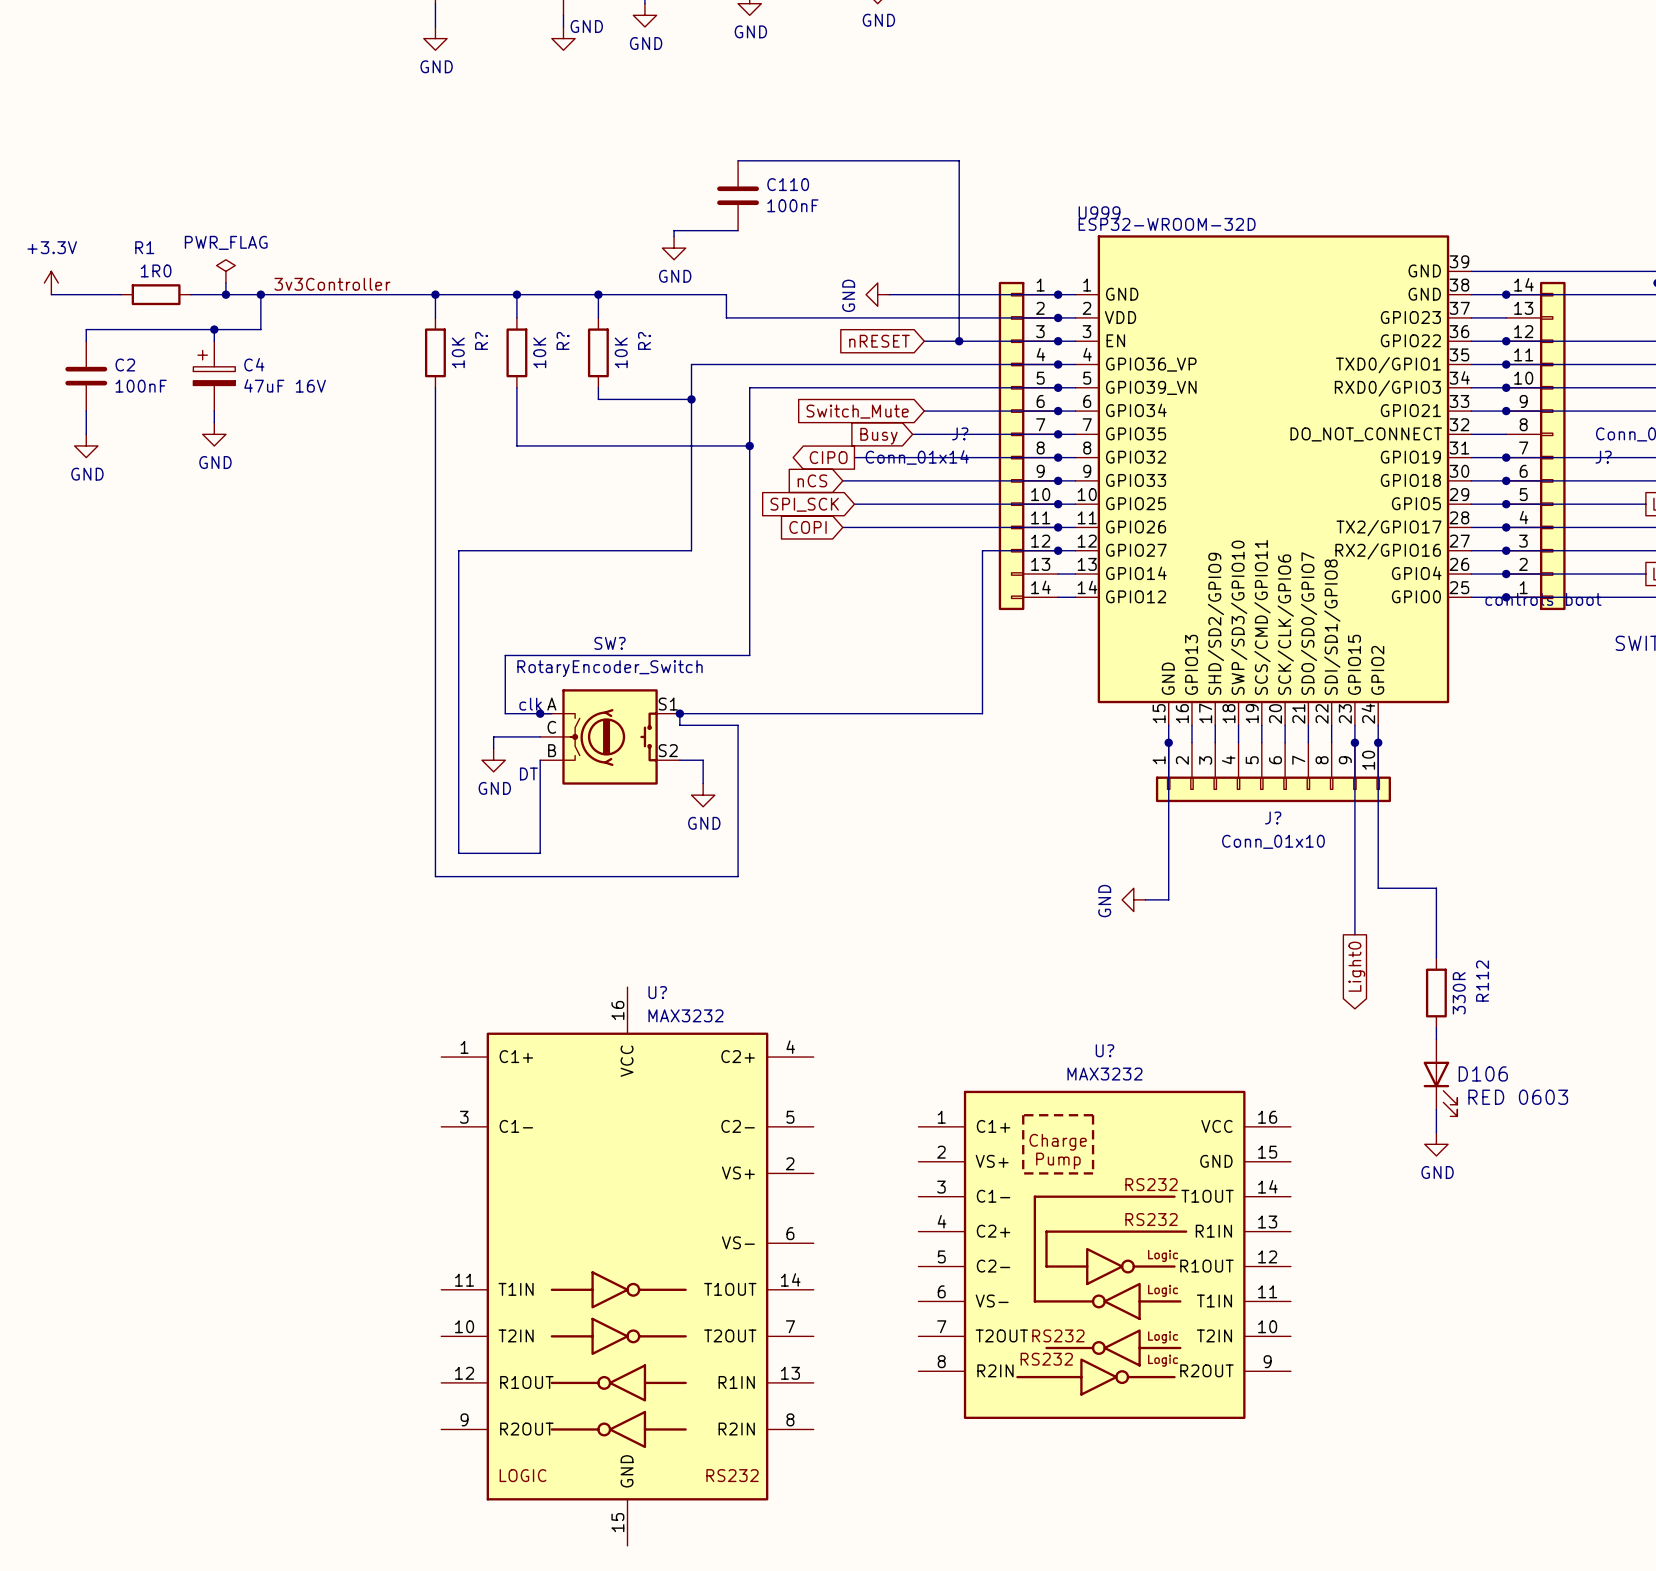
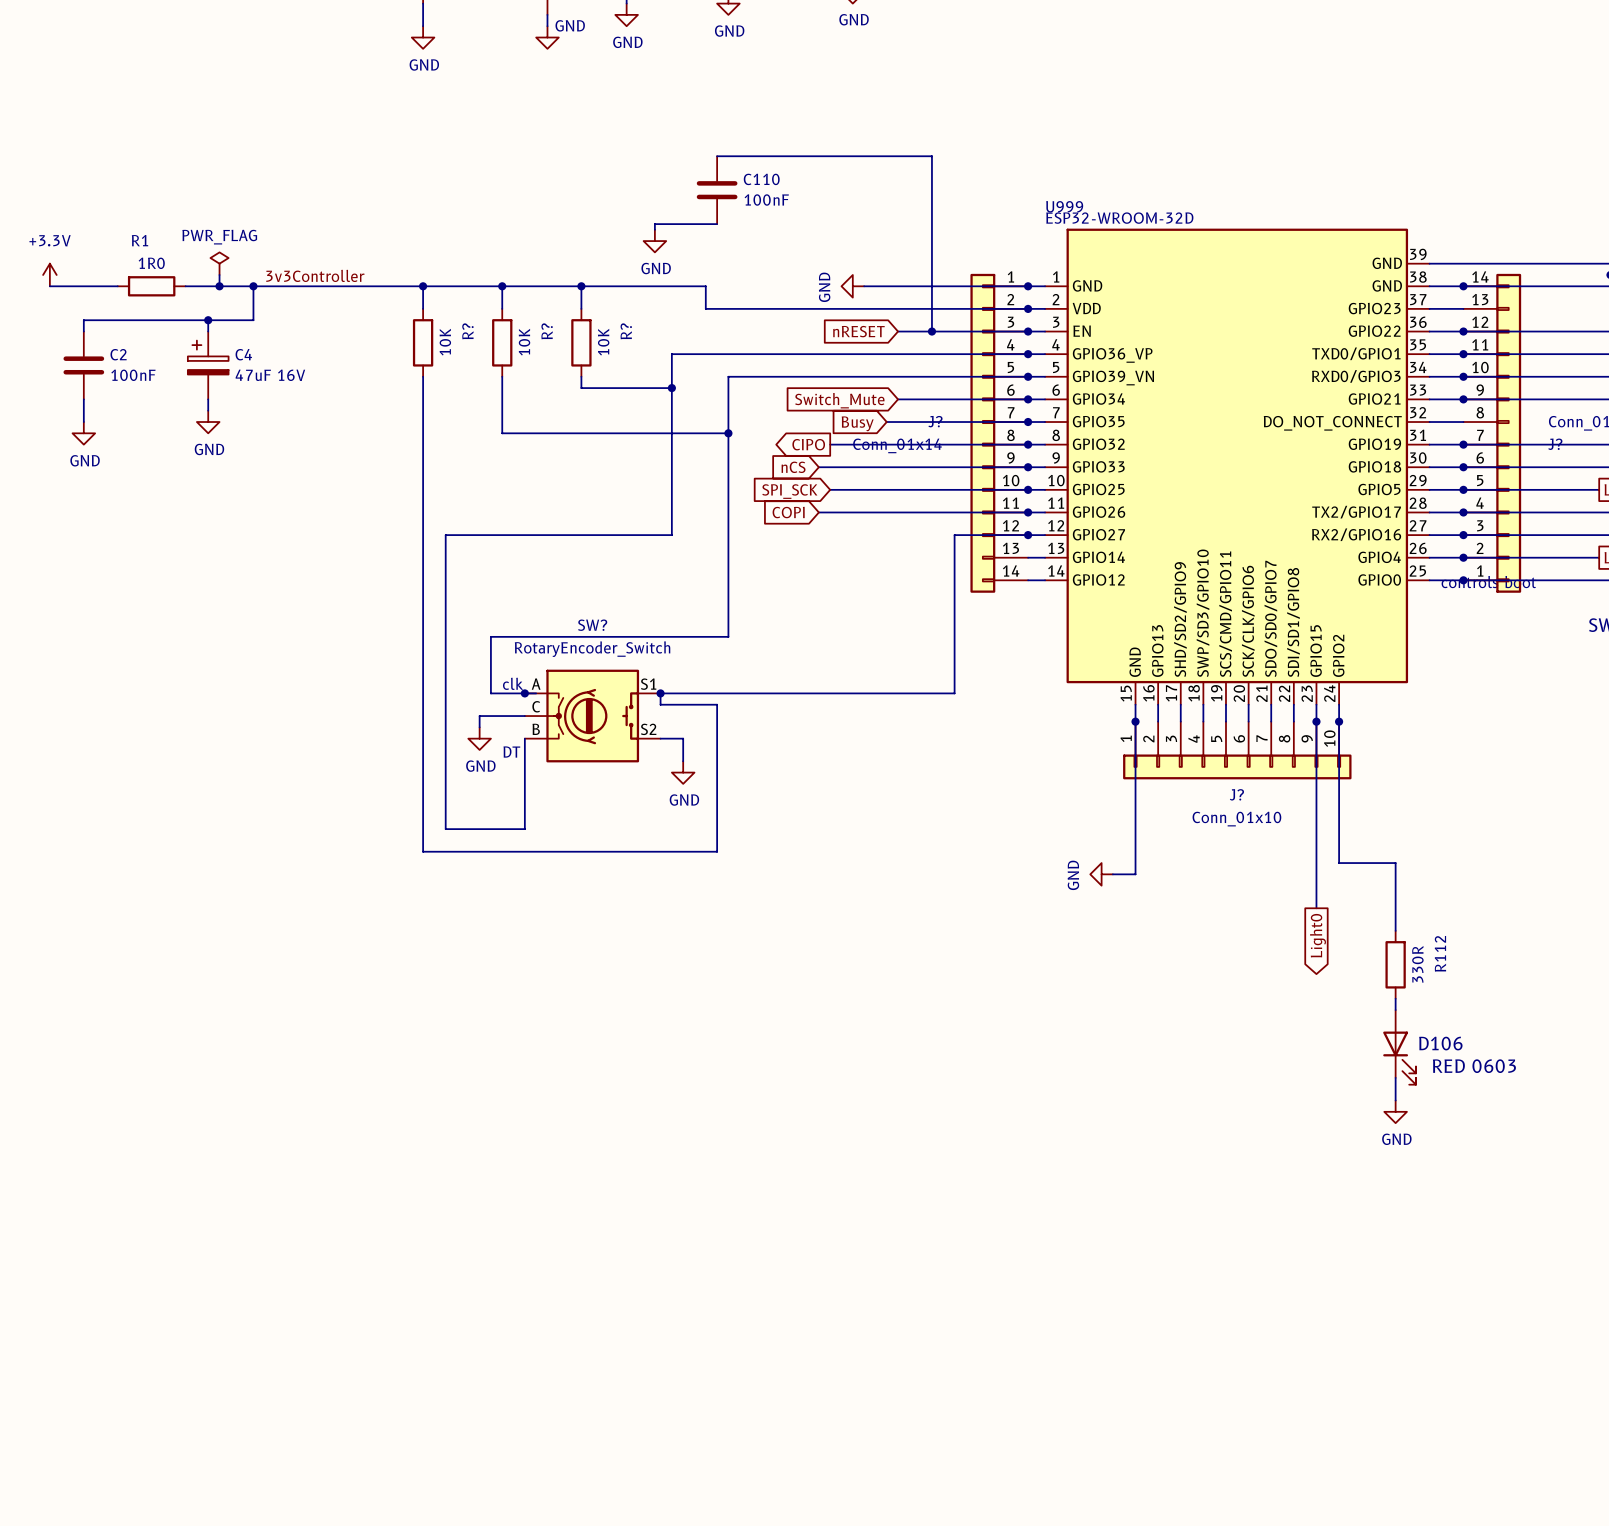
U?: MAX3232 (1104, 1254) -> none
U?: MAX3232 (627, 1266) -> none

